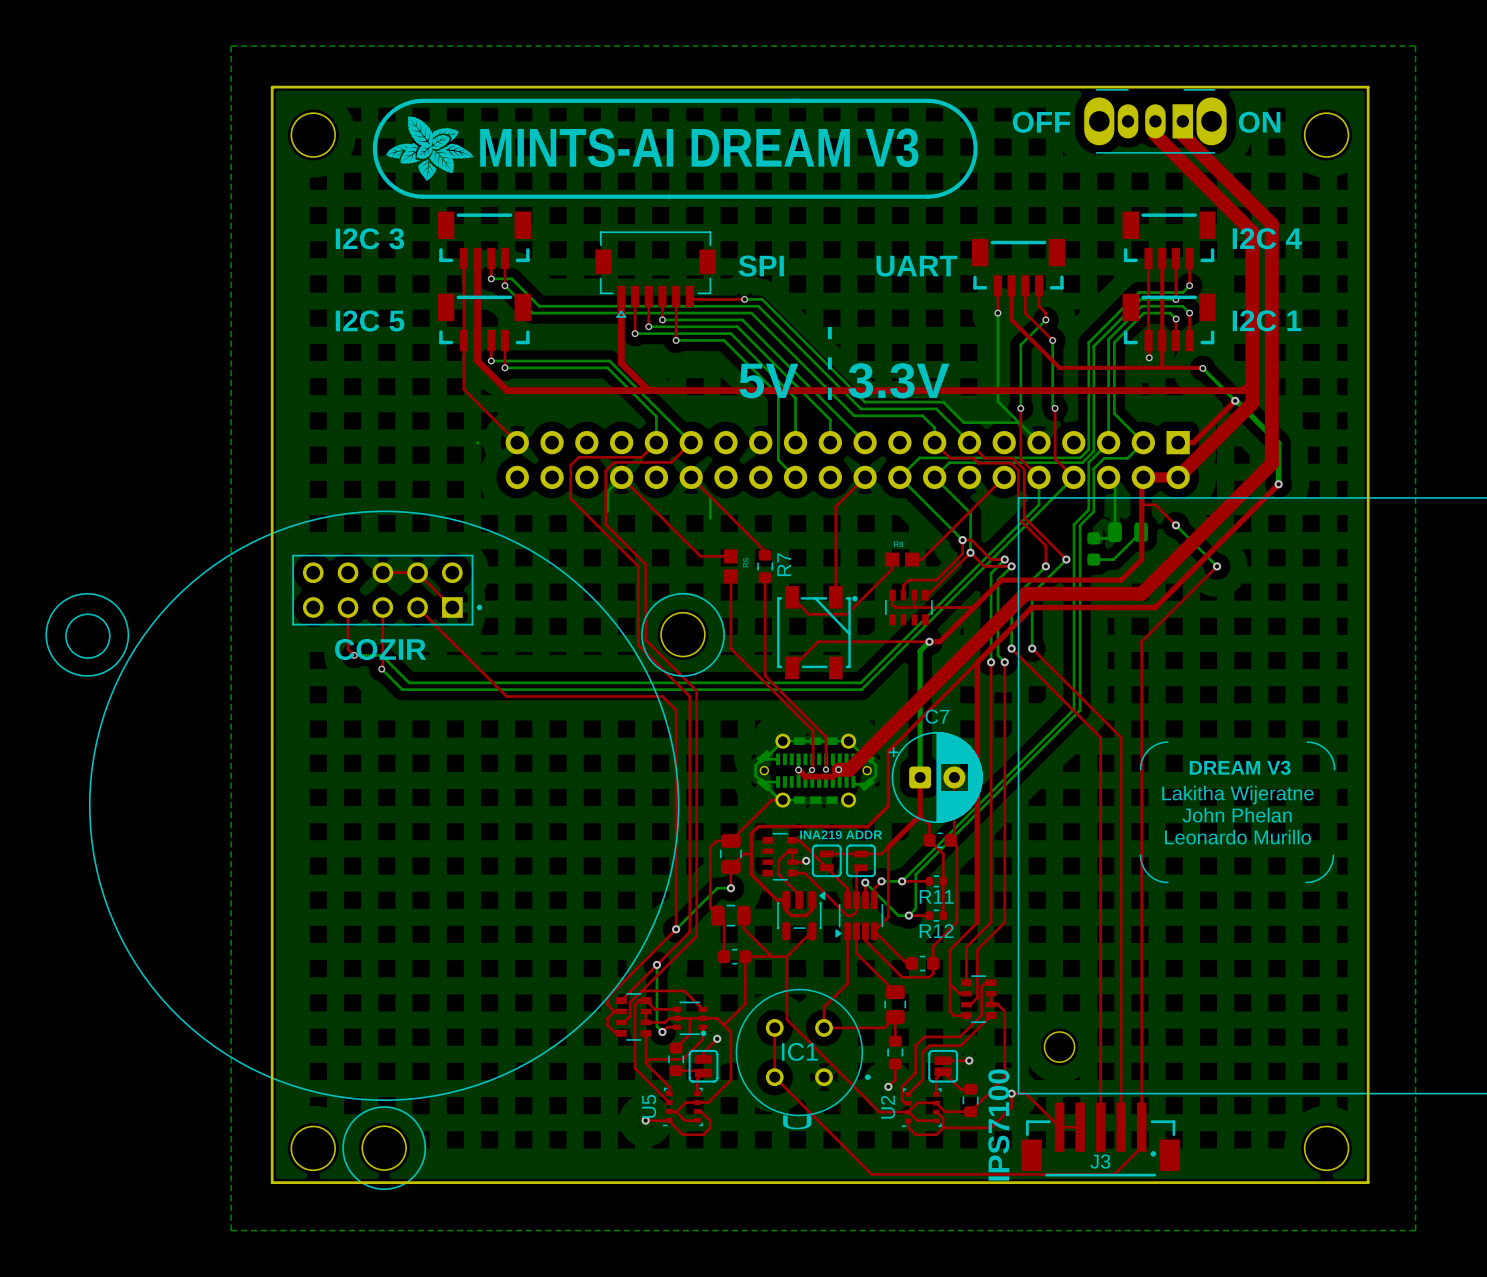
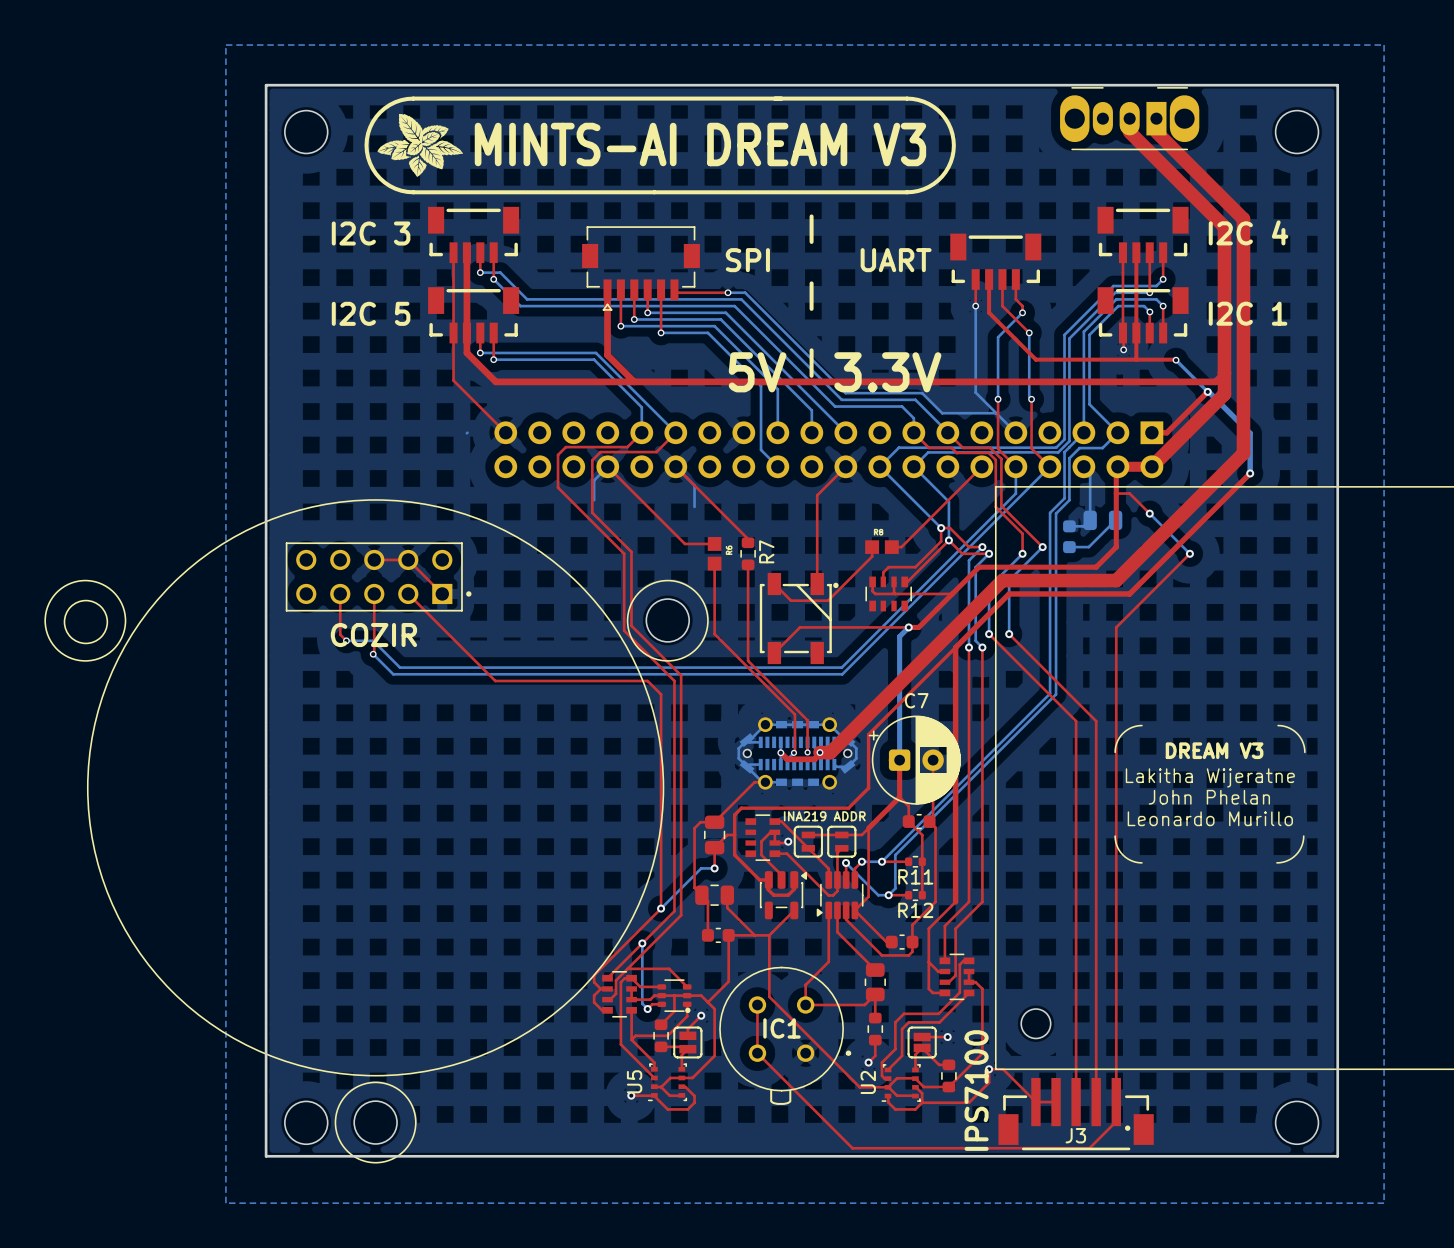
text: OFF (1041, 122) -> none
text: ON (1259, 122) -> none
text position: - - - (829, 363) -> - - - (811, 296)

